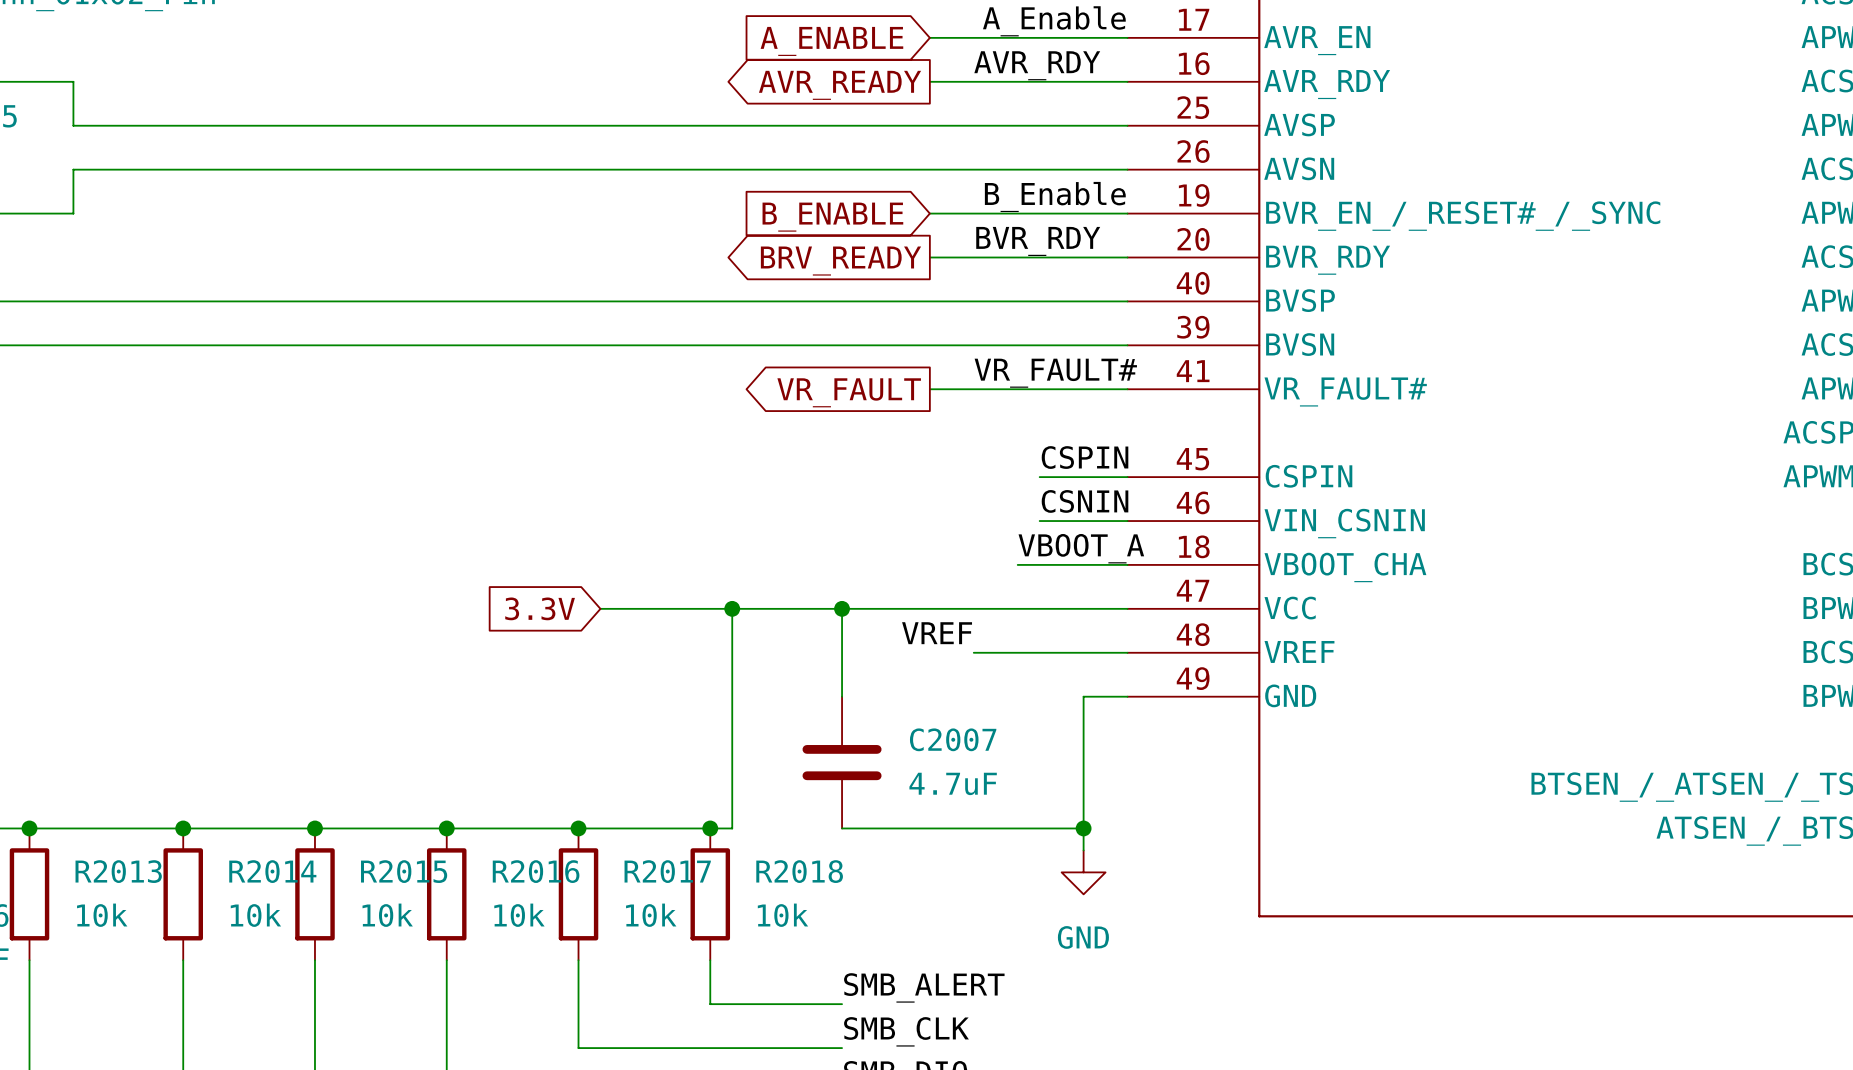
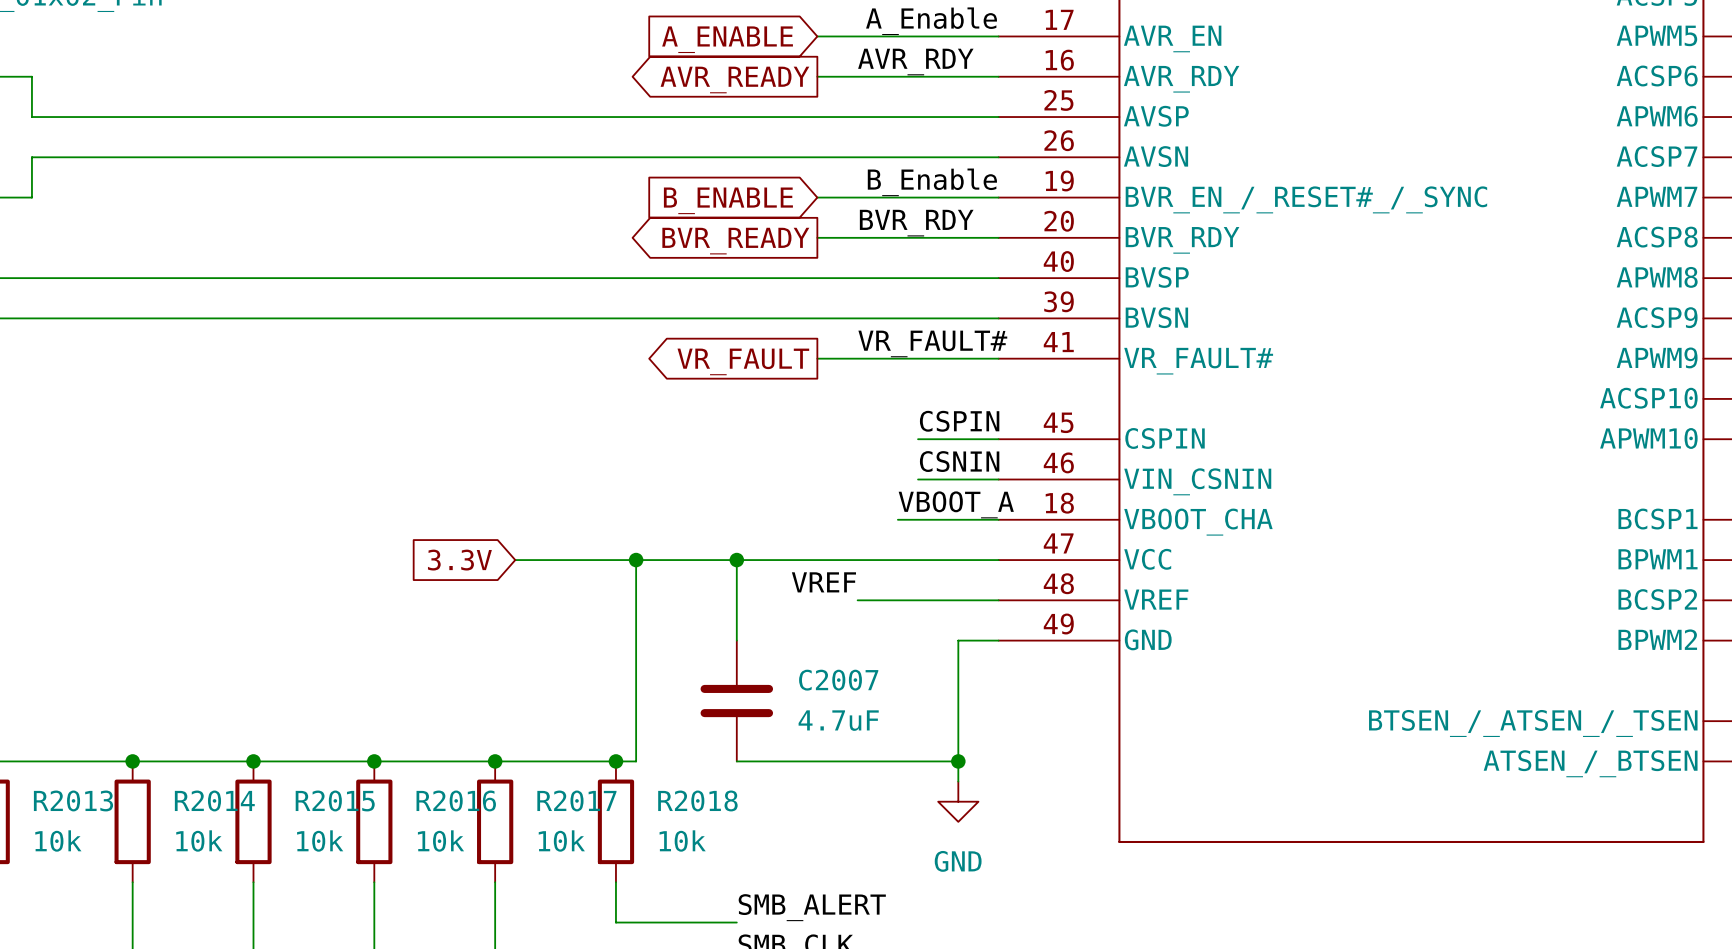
global label: BRV_READY (840, 261) -> BVR_READY (735, 241)

